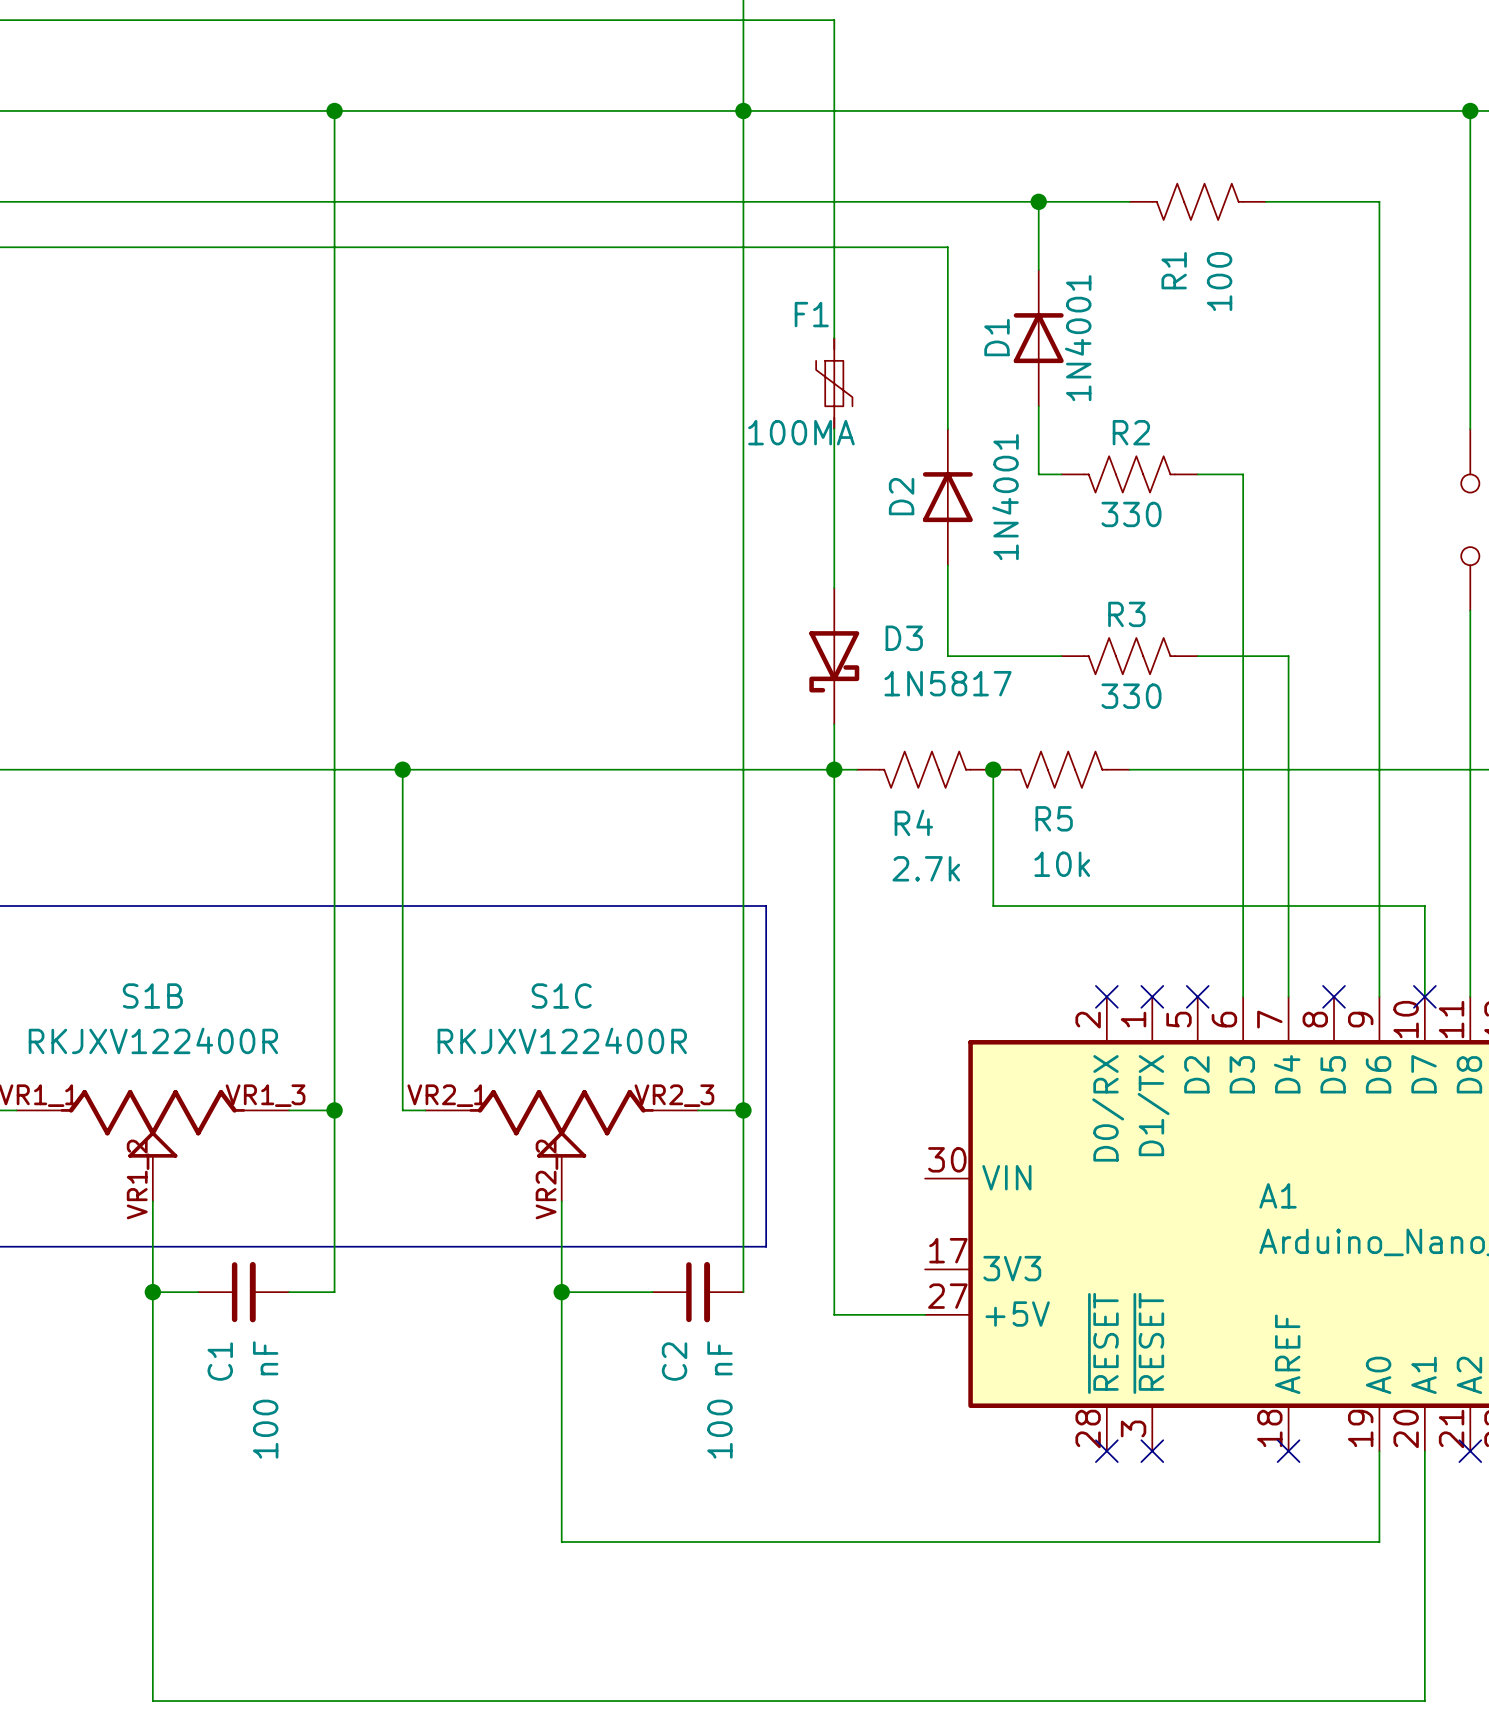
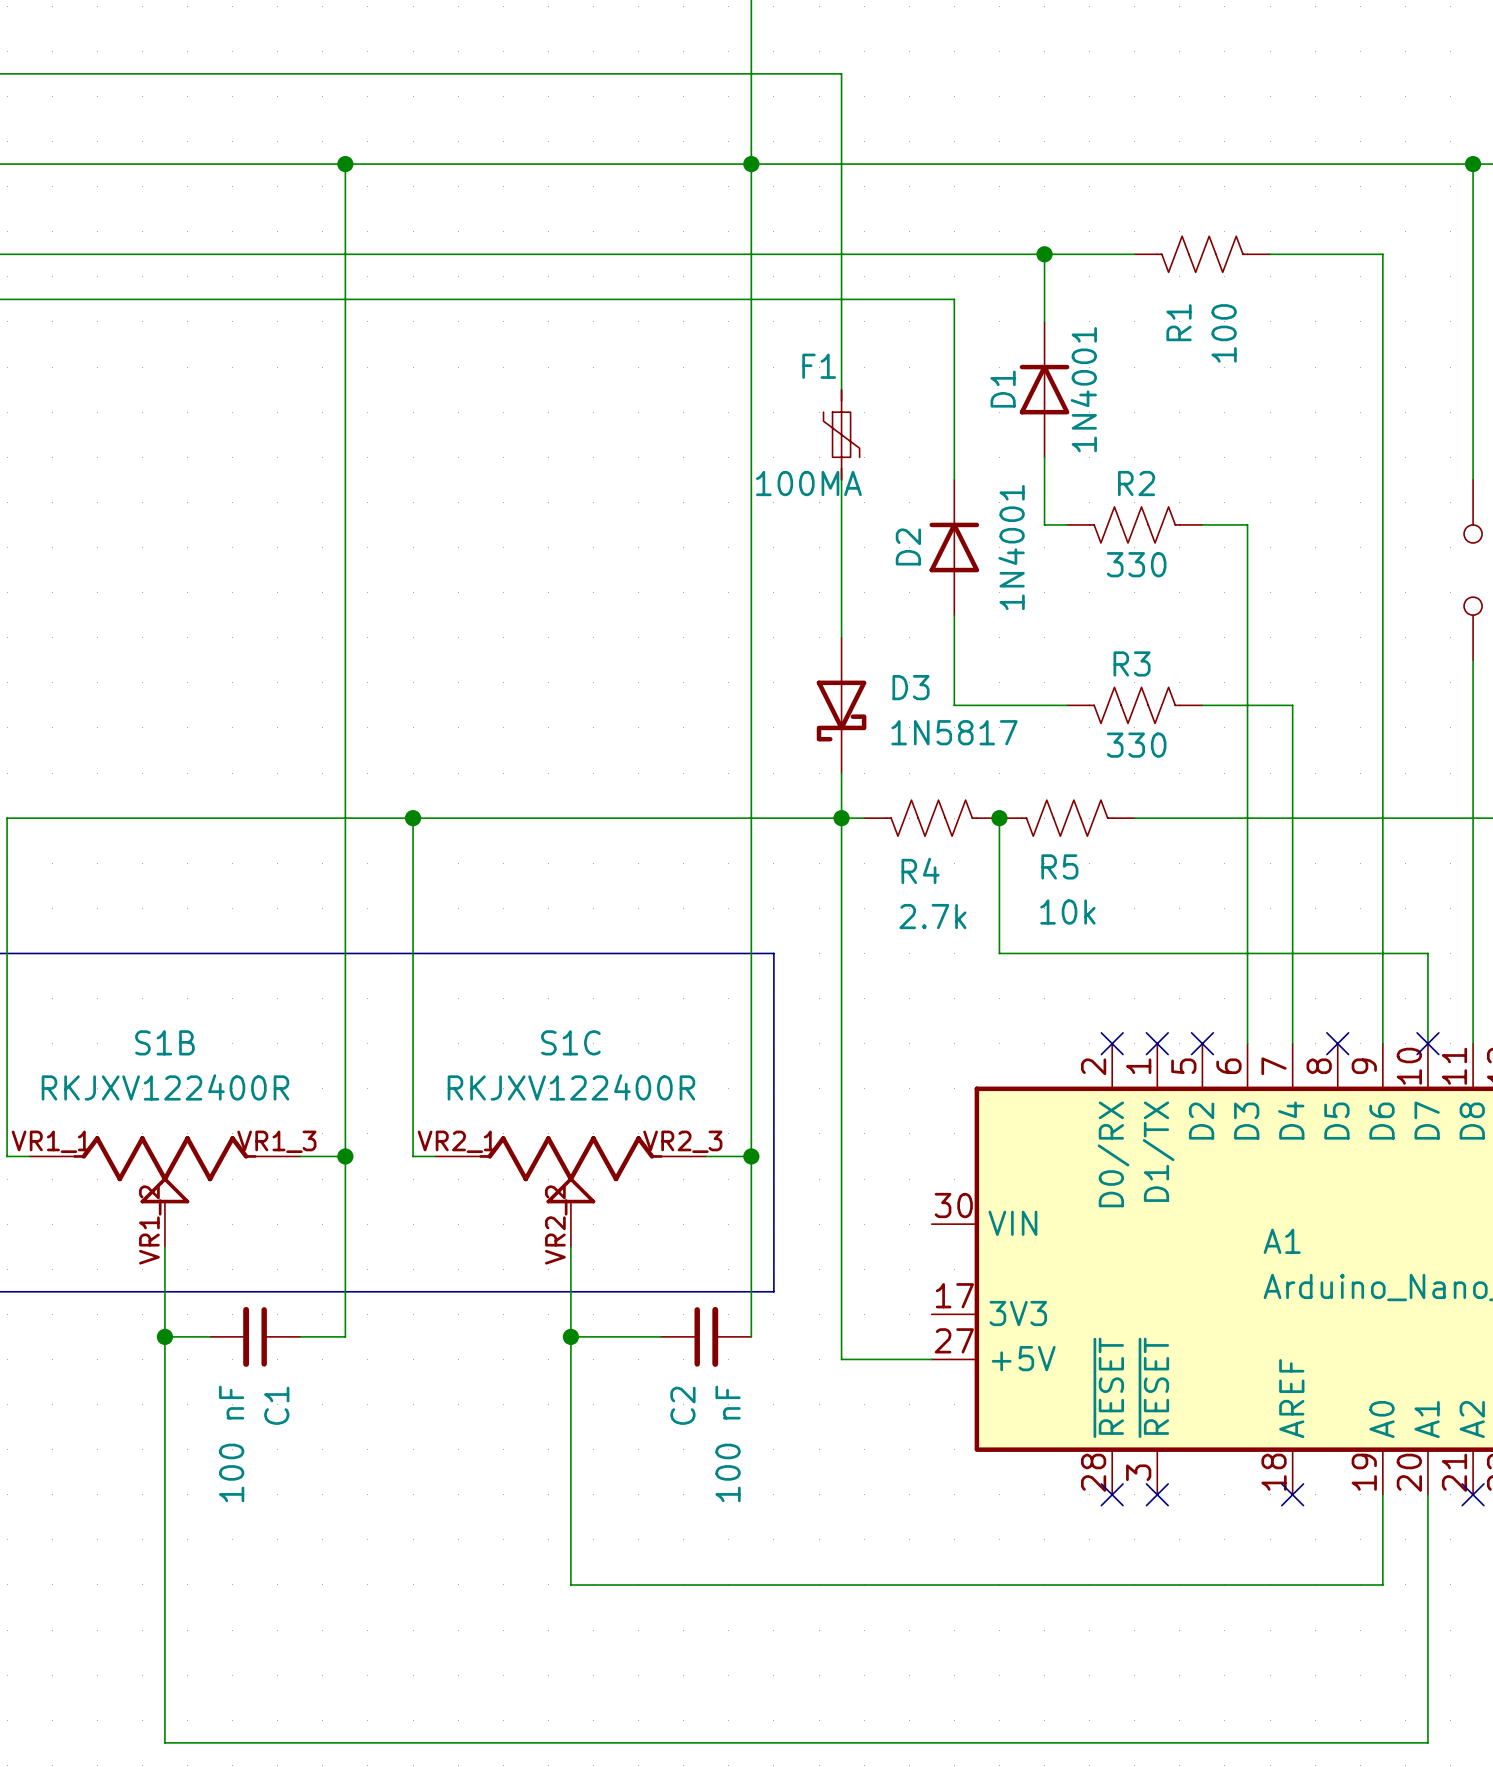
C1 rotation: 0° (243, 1292) -> 180° (255, 1336)
C1 name position: C1 (220, 1361) -> C1 (276, 1405)
C1 value position: 100 nF (265, 1399) -> 100 nF (231, 1443)

